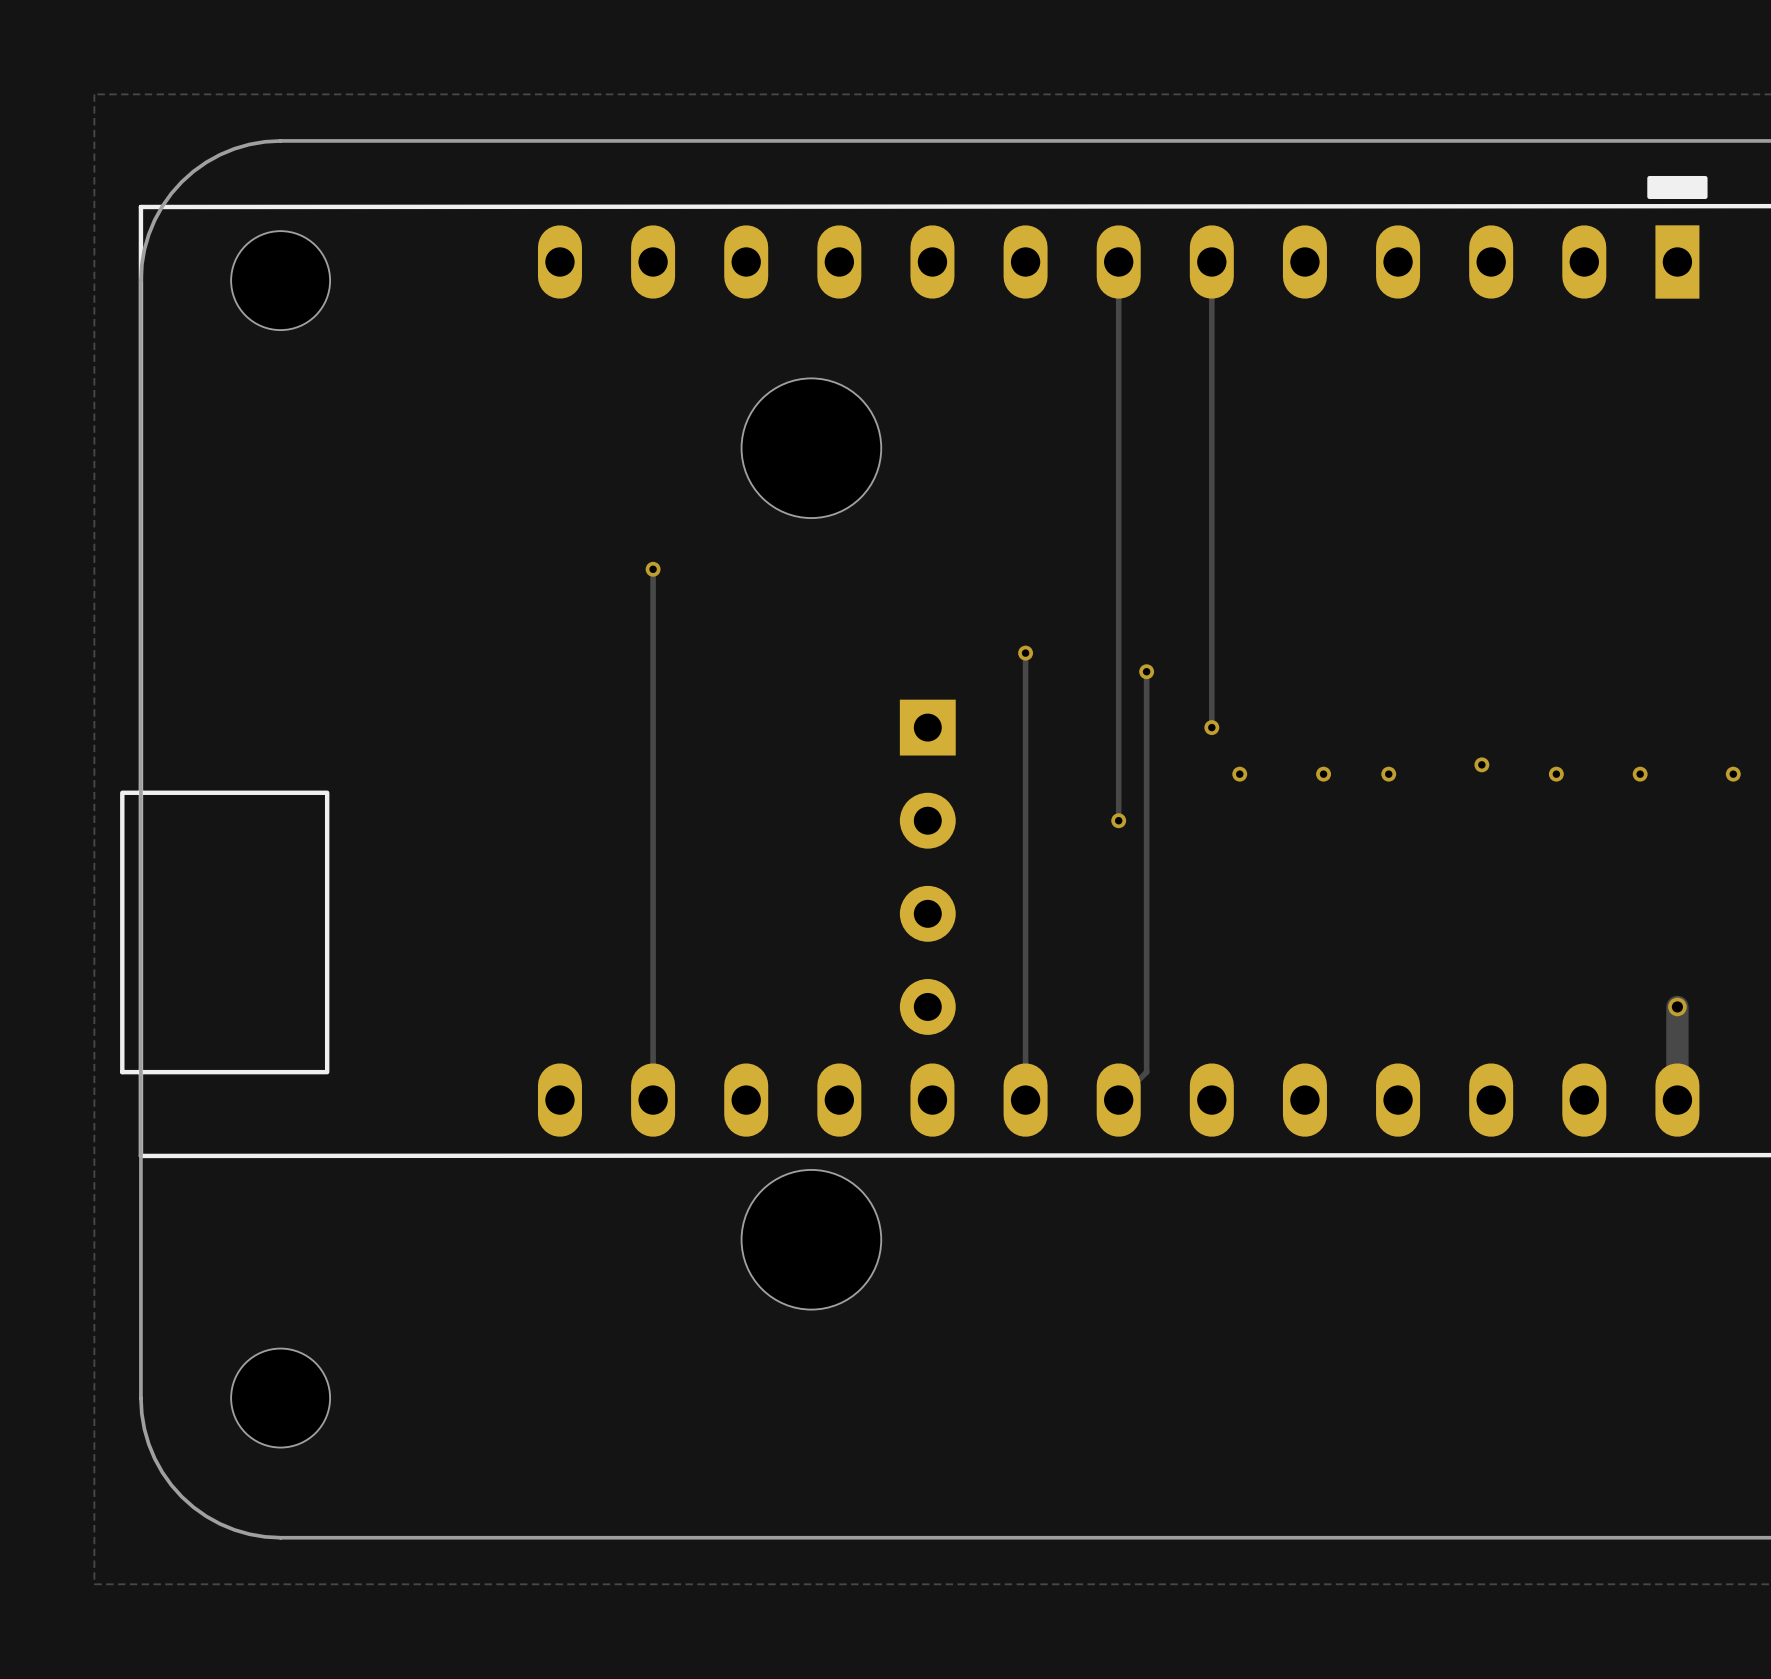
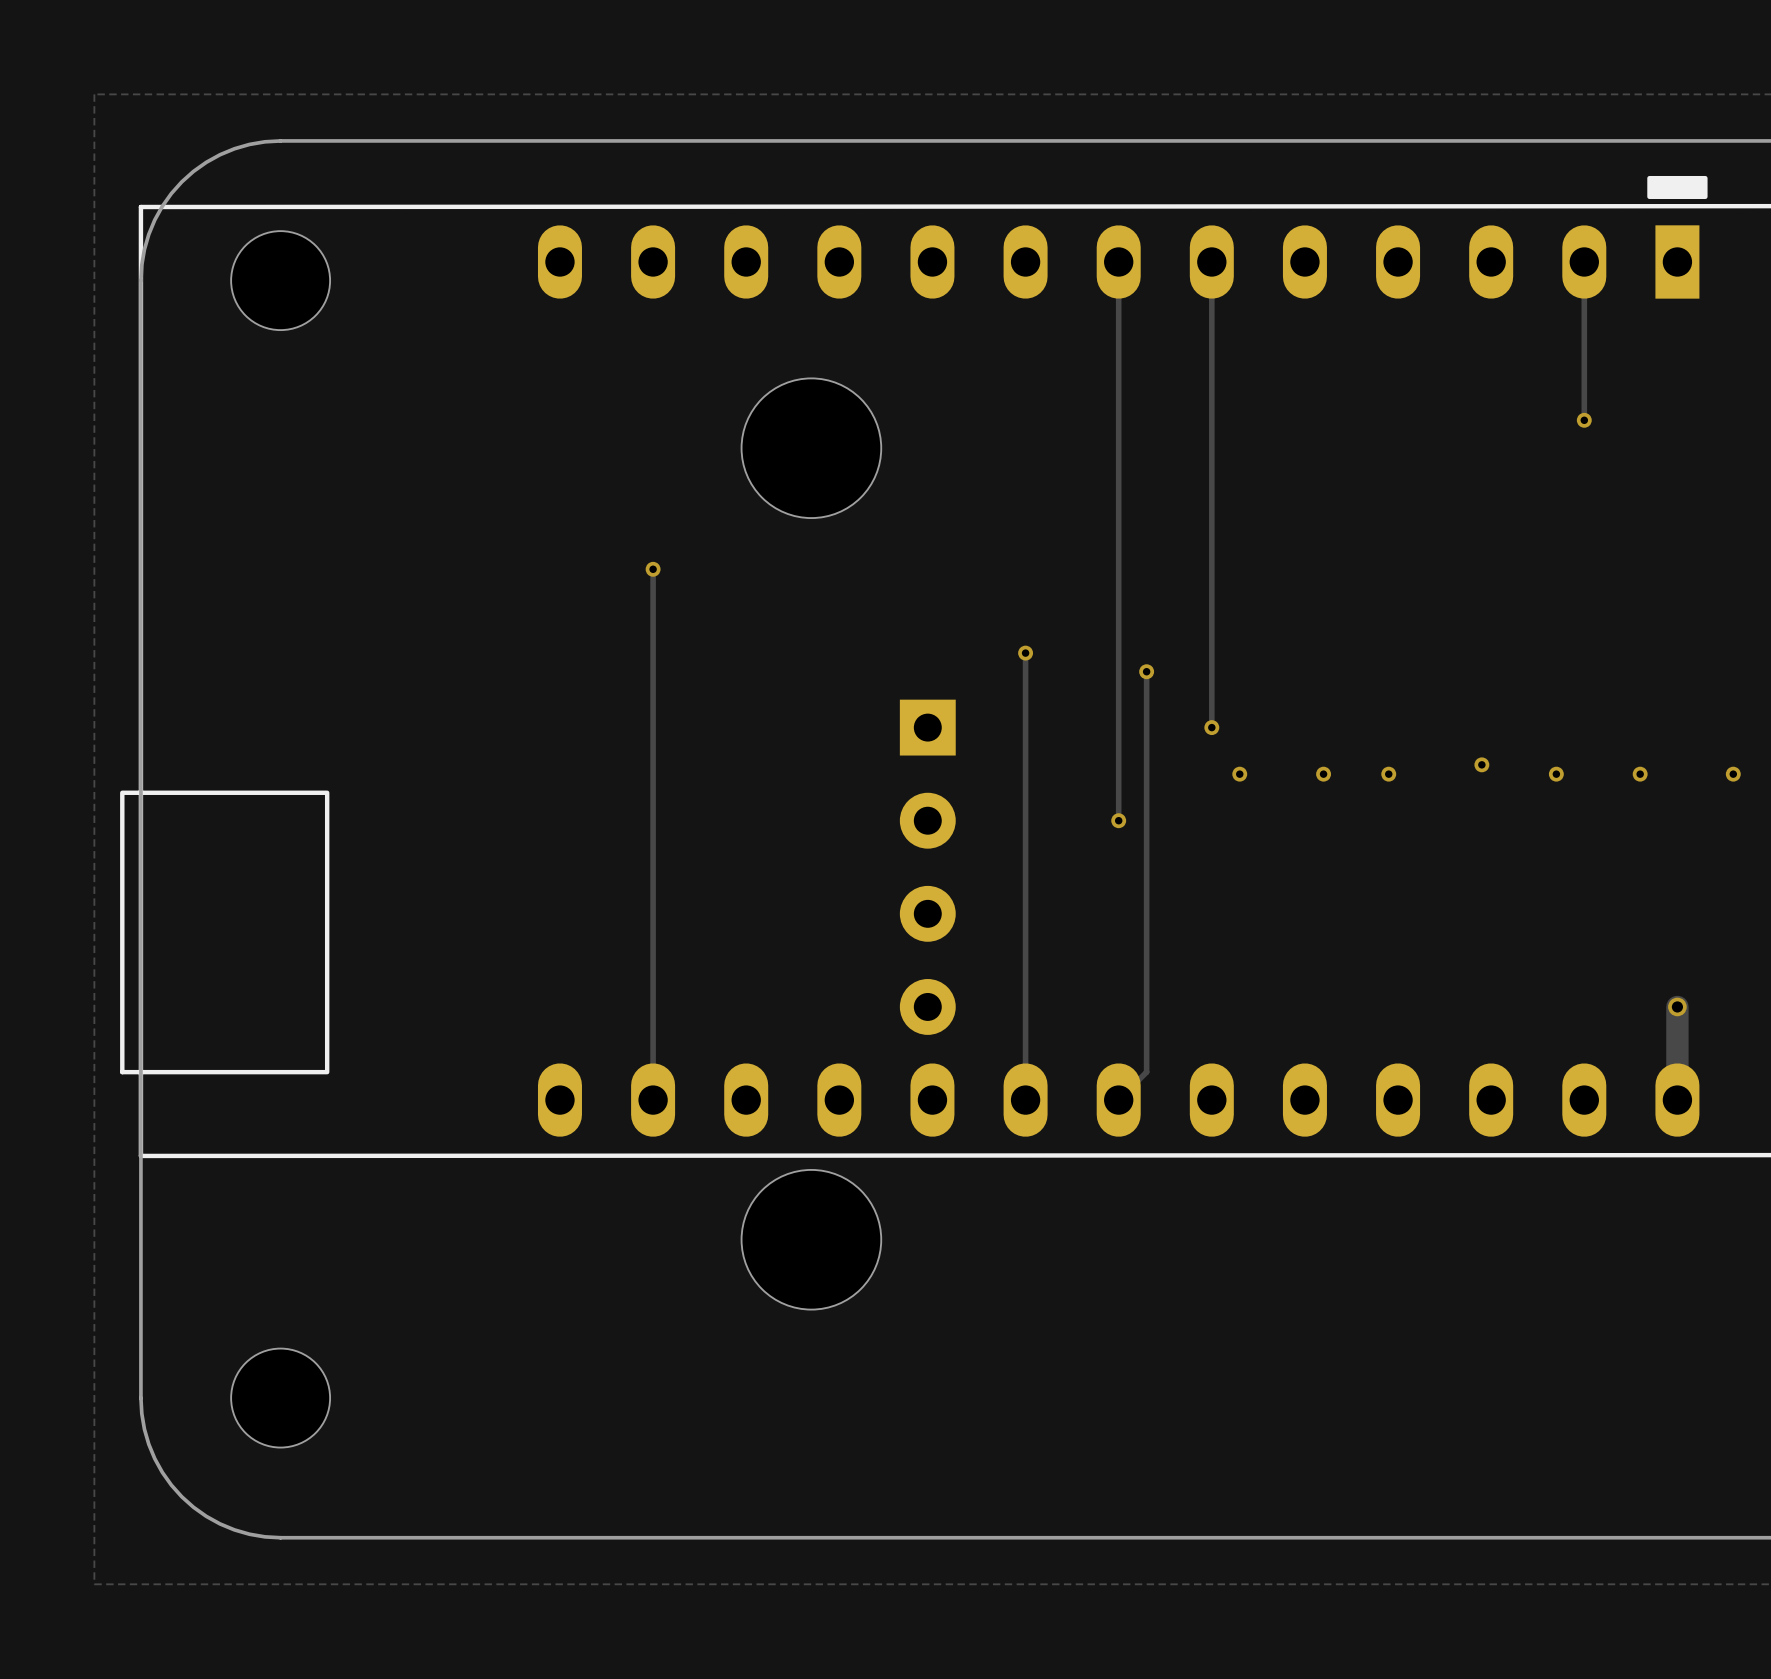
track: none -> (1584, 261) (1584, 420)
via: none -> (1584, 420)

